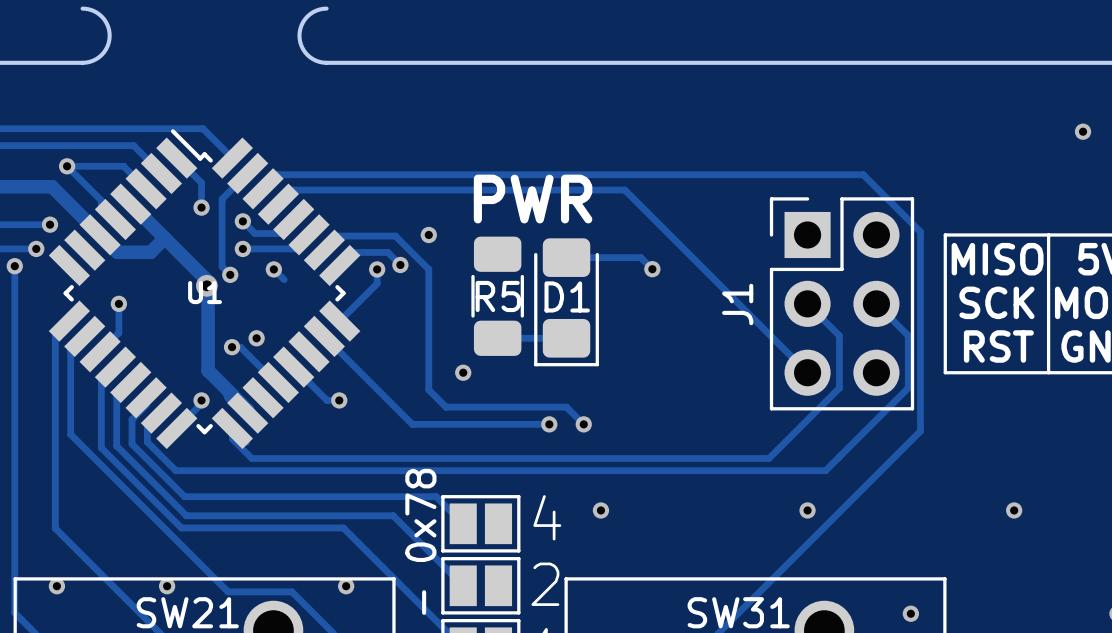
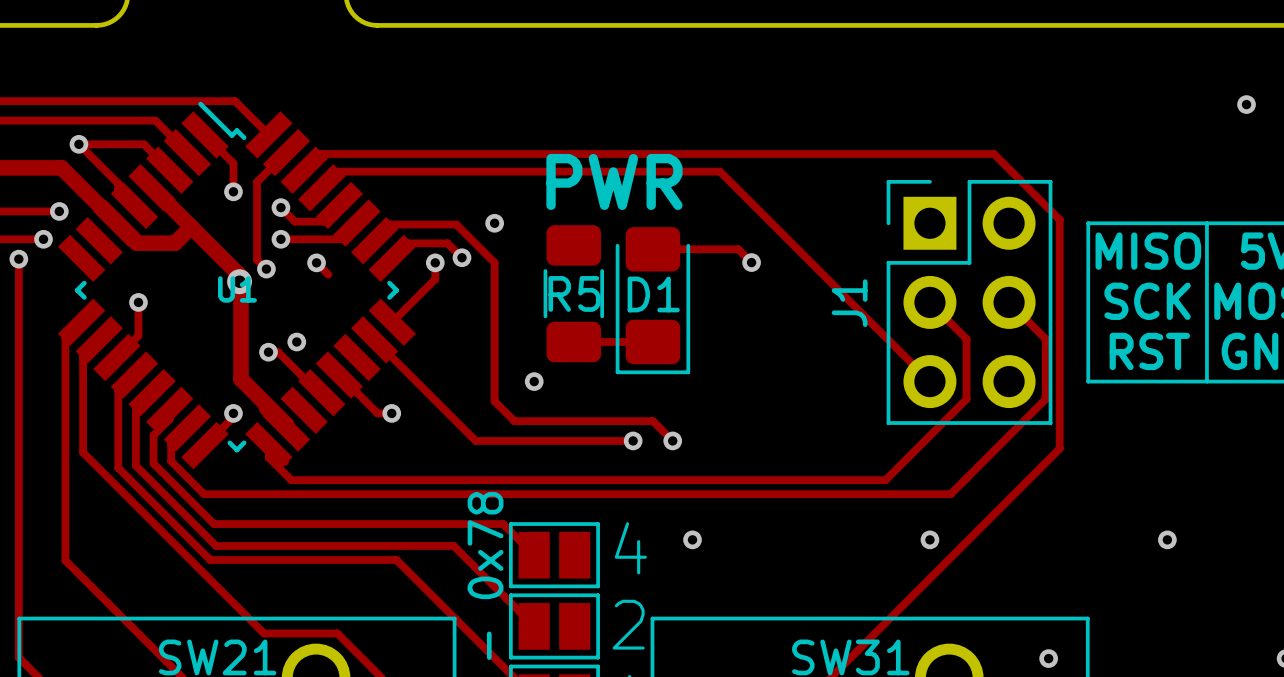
via: (56, 586) -> none
via: (167, 586) -> none
via: (346, 586) -> none

